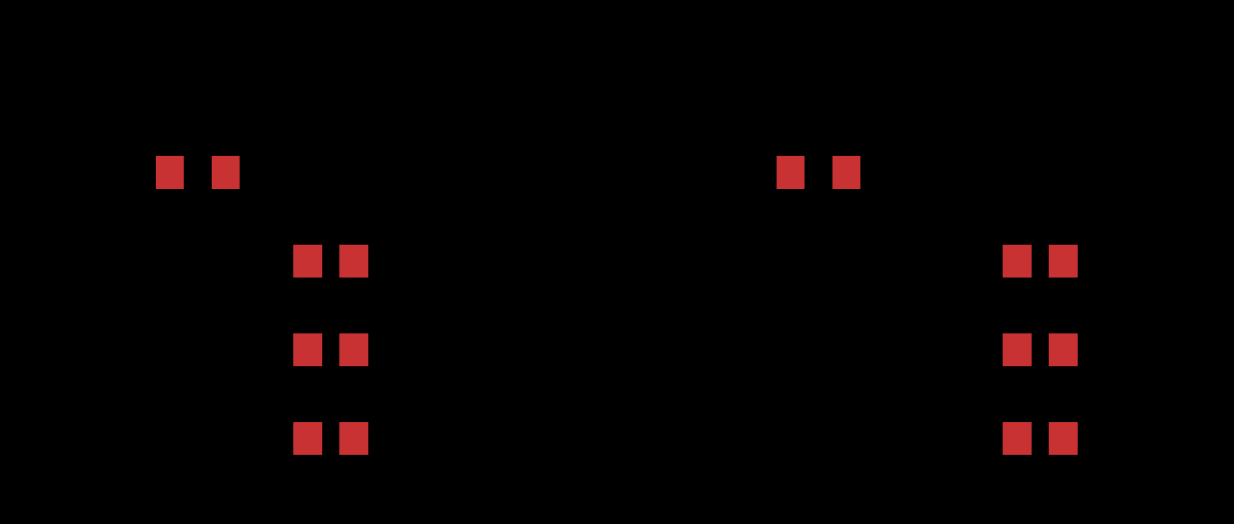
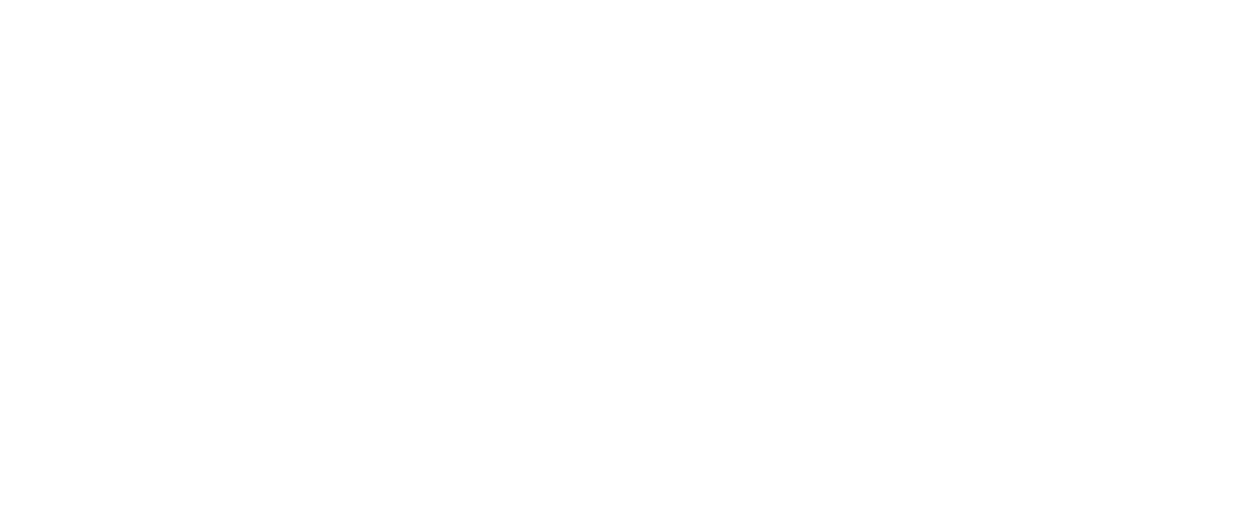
part: (197, 172) -> none
part: (818, 172) -> none
part: (330, 261) -> none
part: (1040, 261) -> none
part: (330, 349) -> none
part: (1040, 349) -> none
part: (330, 438) -> none
part: (1040, 438) -> none

